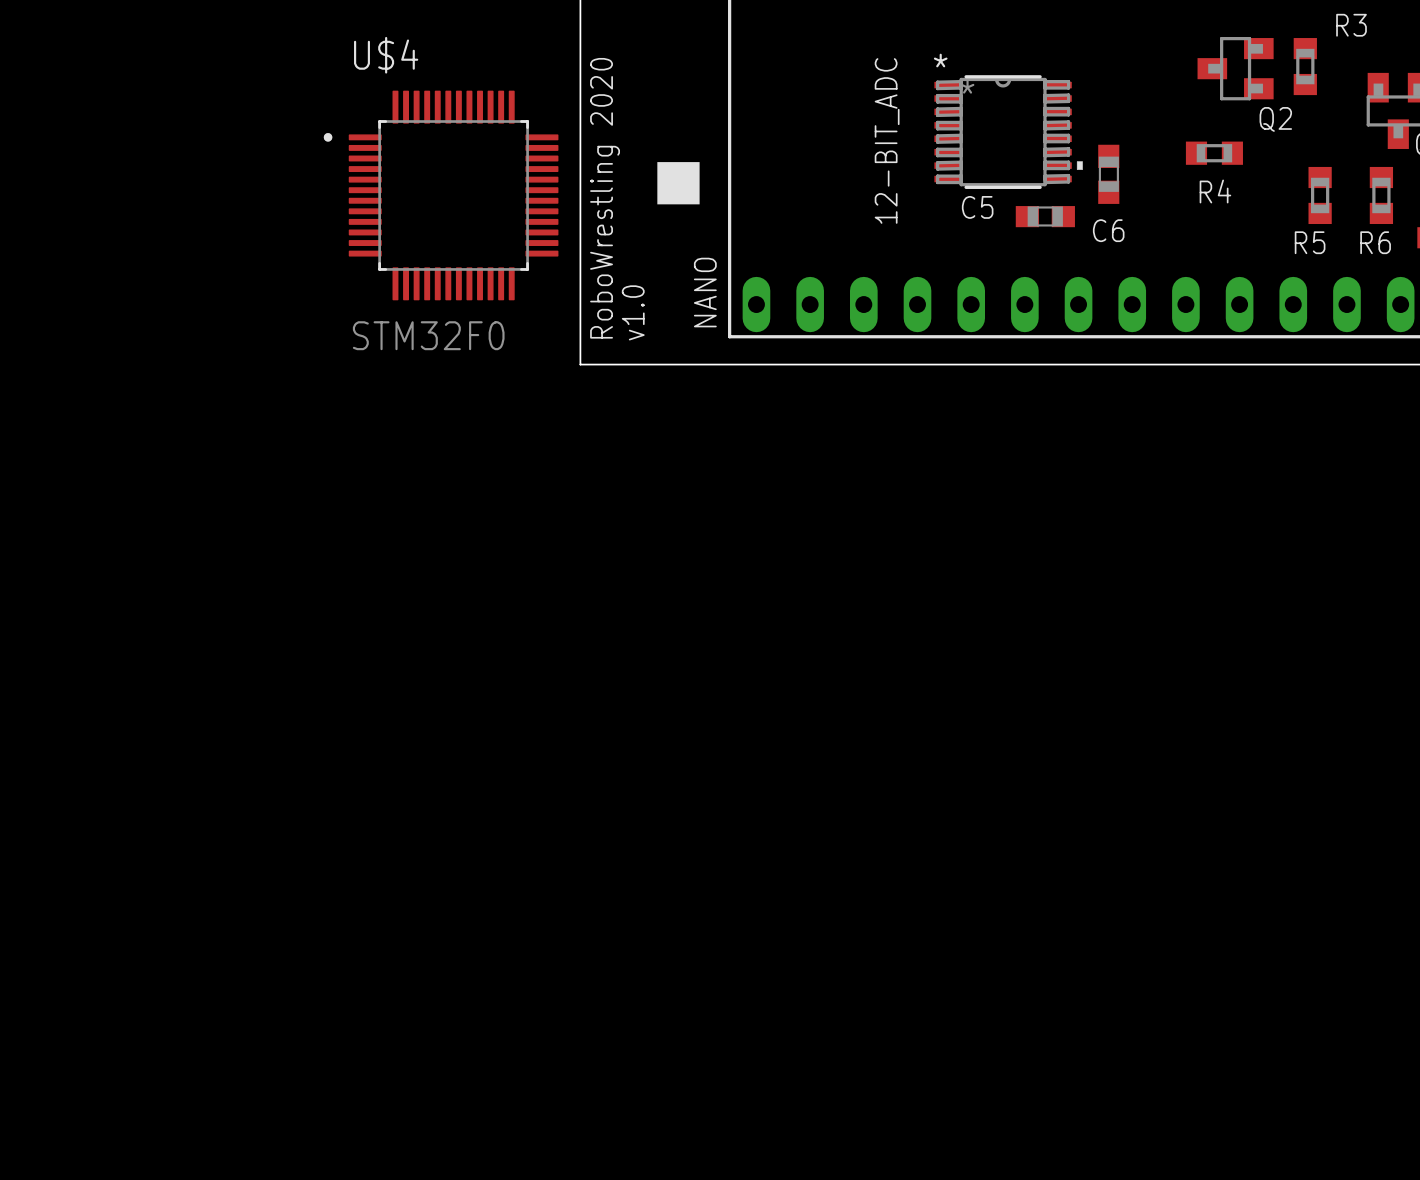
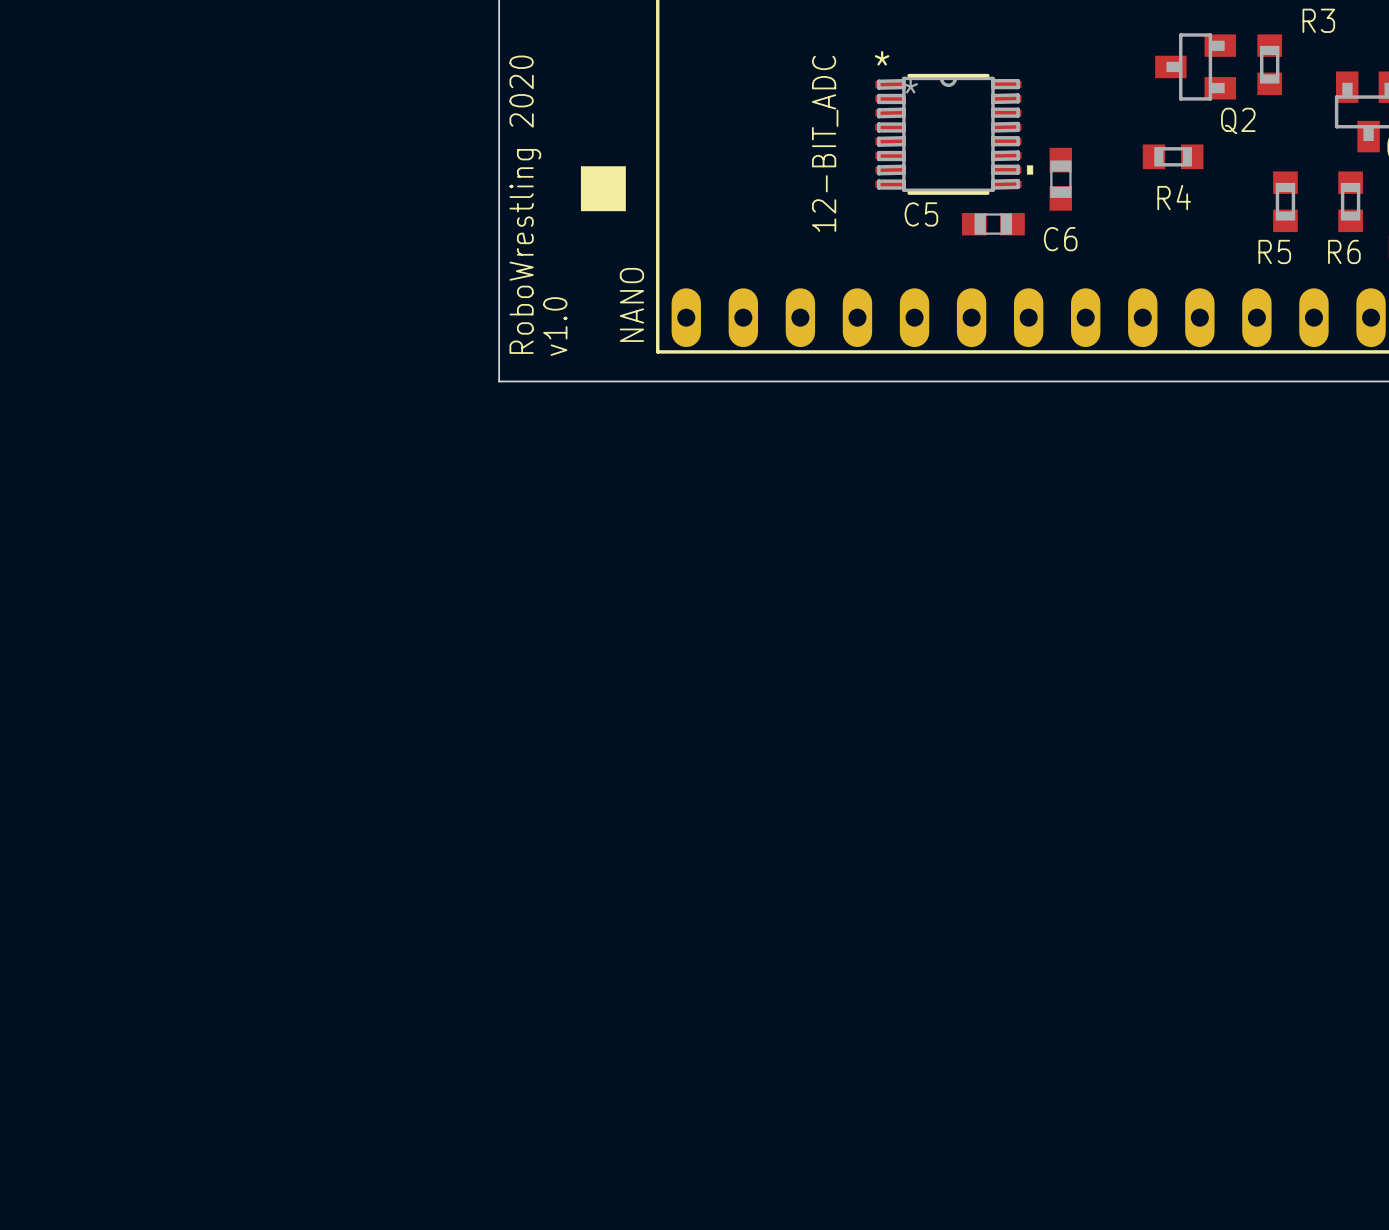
U$4: STM32F0 (441, 195) -> none

